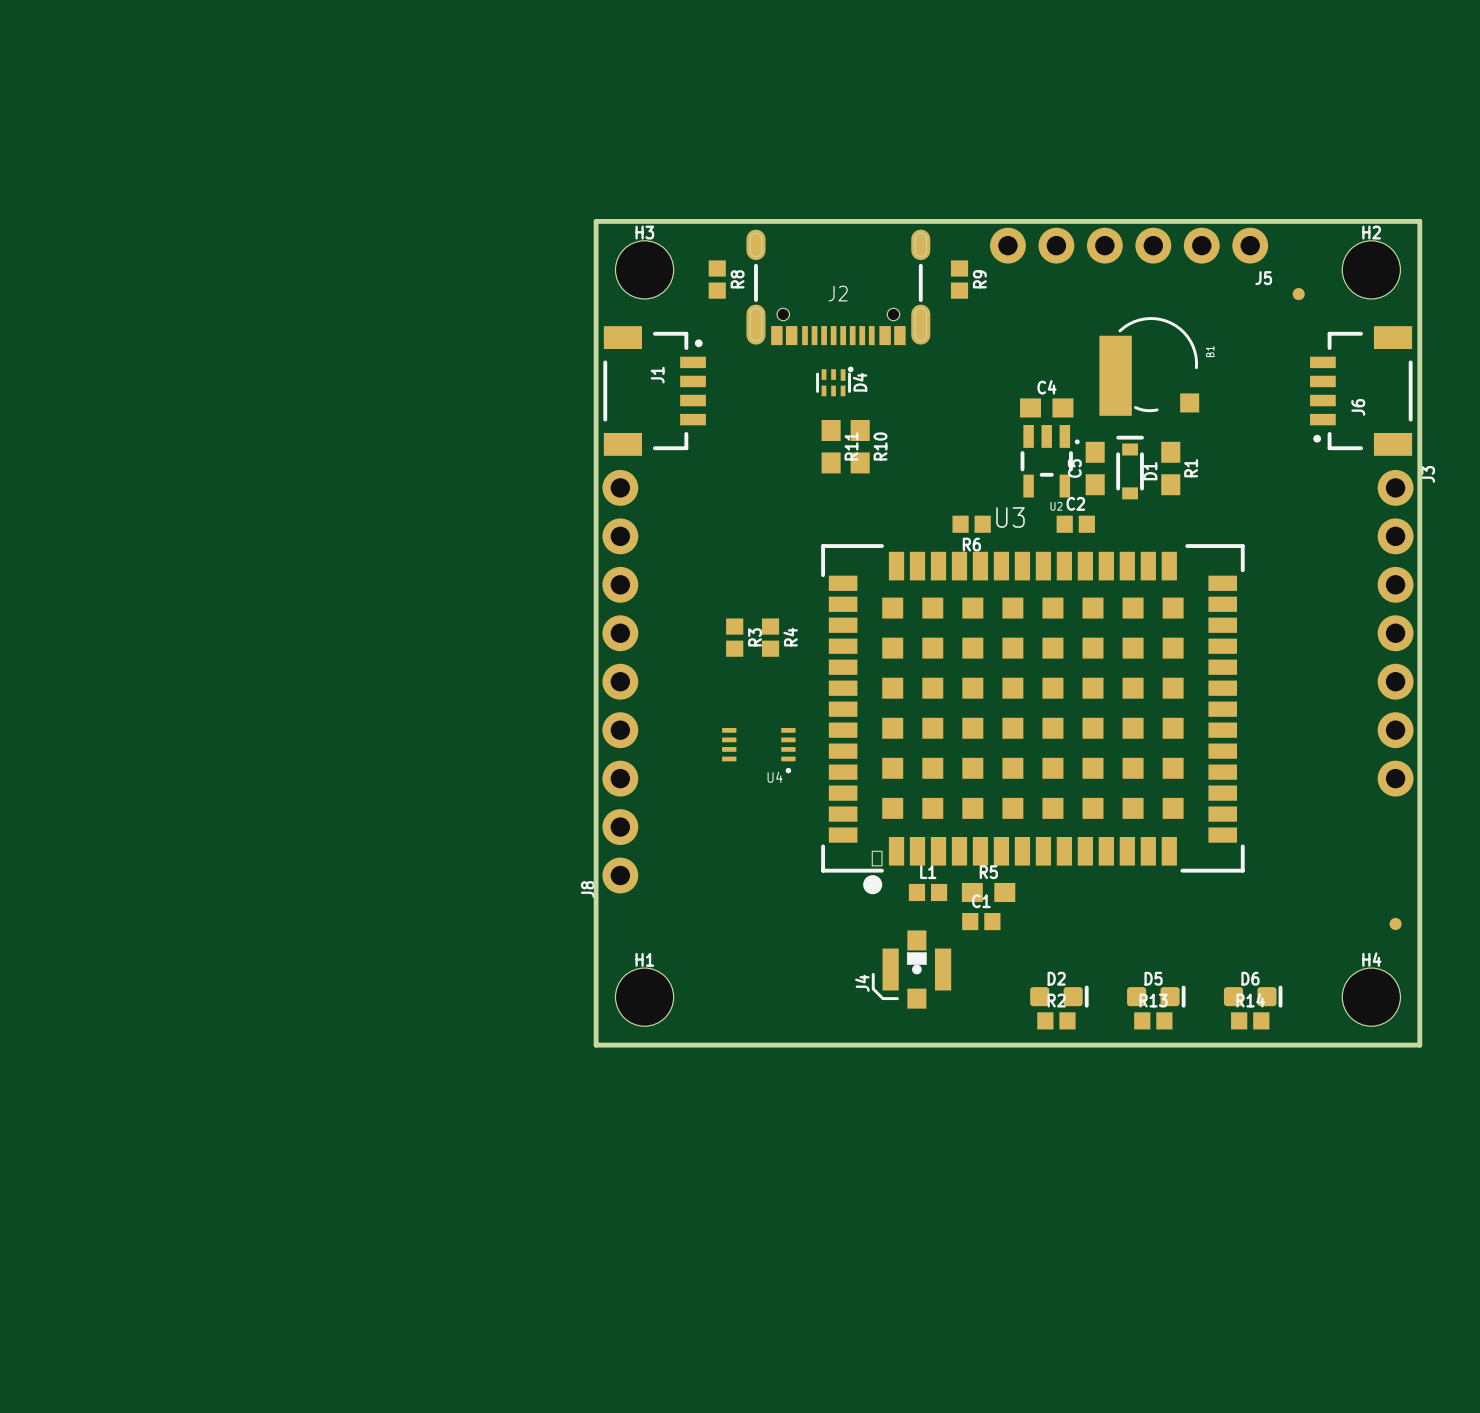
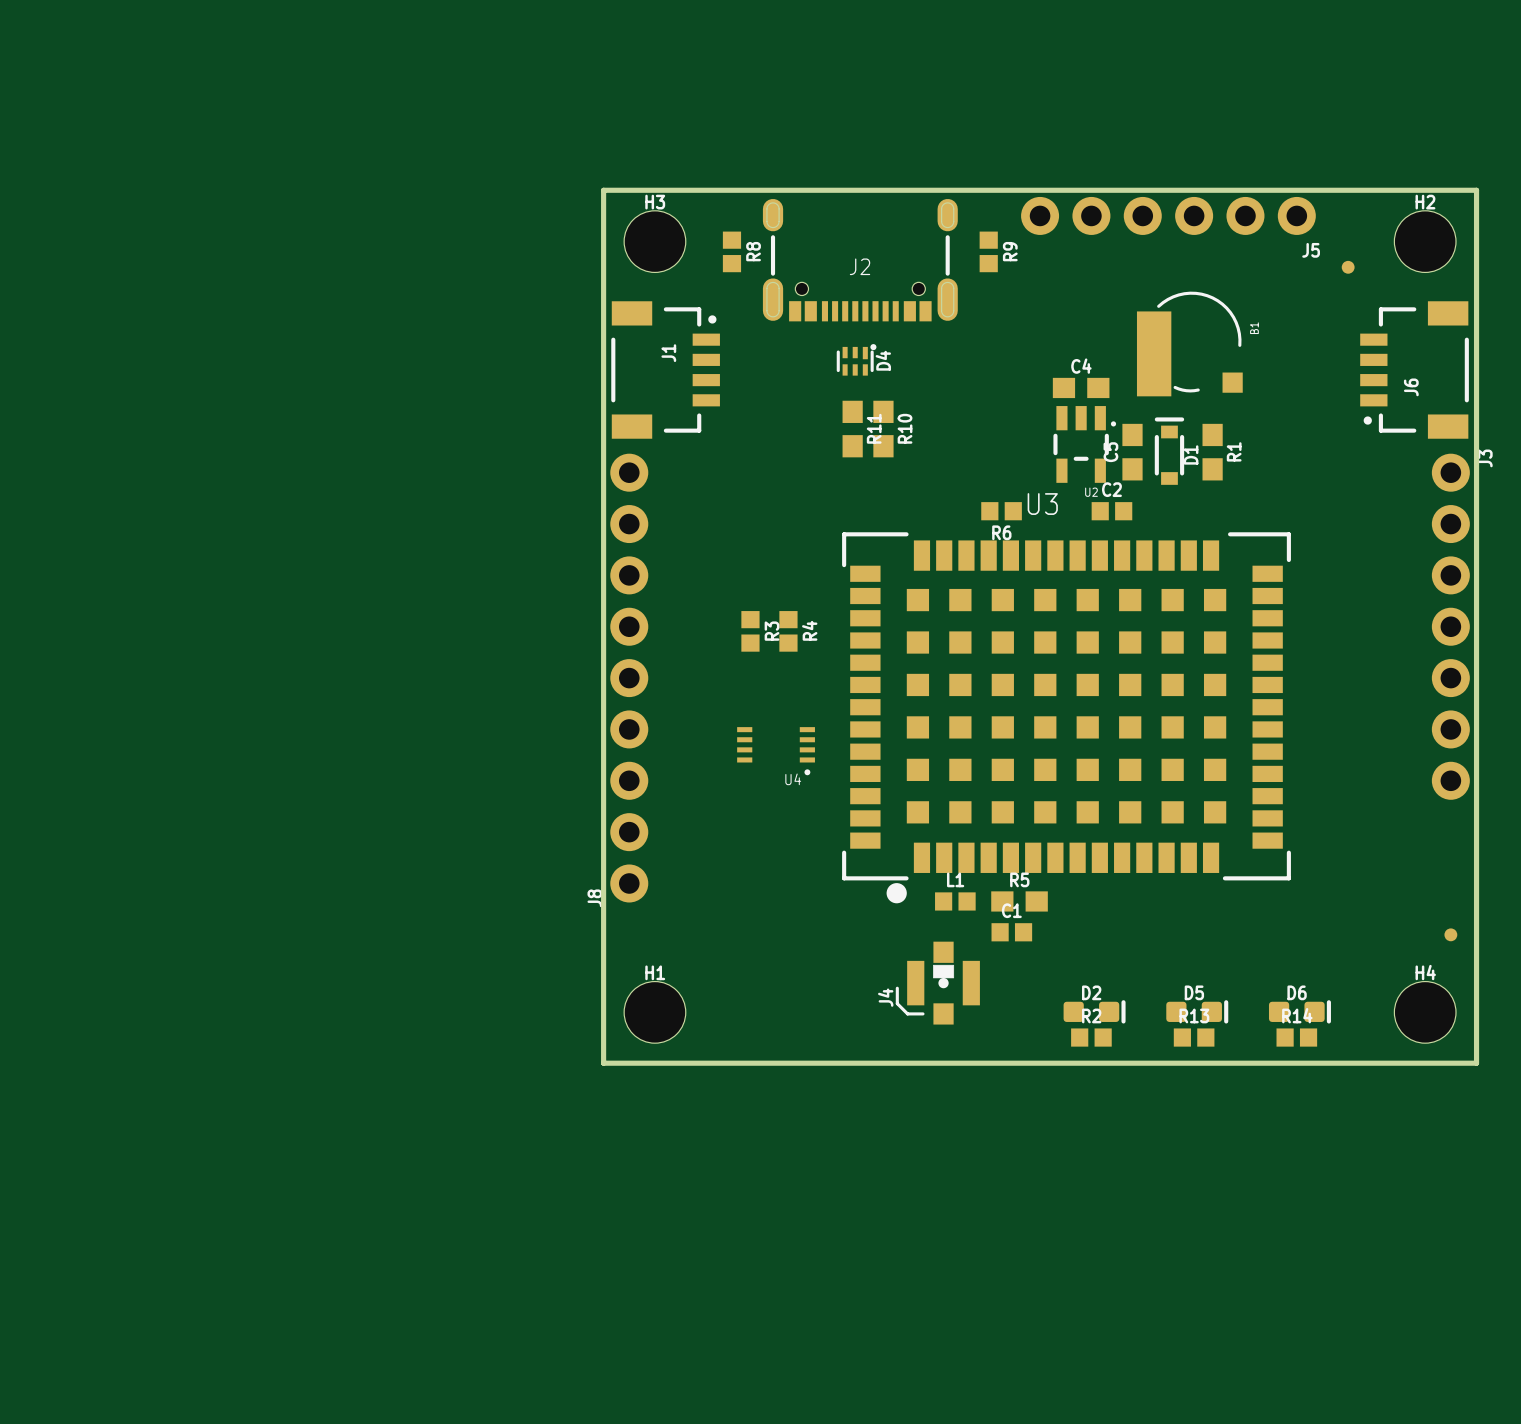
U3 footprint: [821, 544, 1245, 895] -> [842, 532, 1291, 904]

